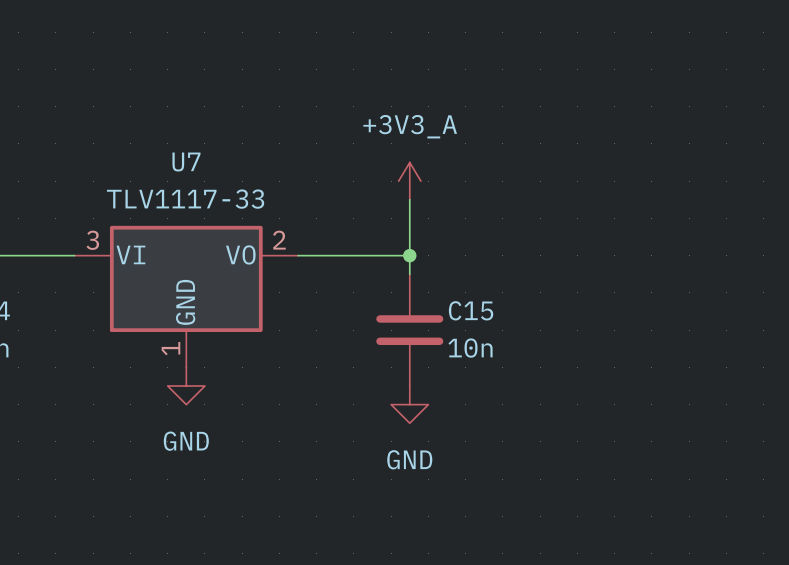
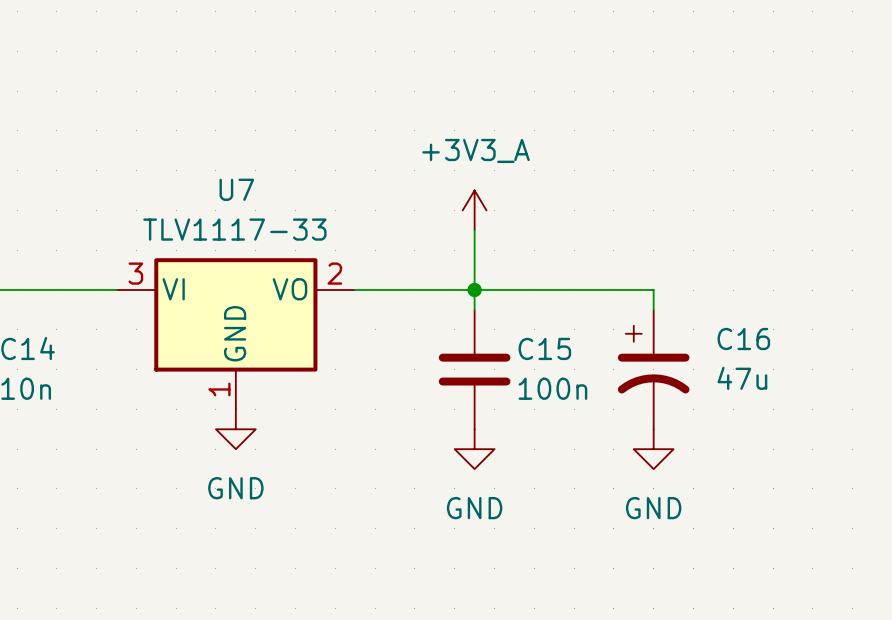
wire: none -> (474, 290) (653, 290) (653, 309)
C16: none -> 47u (653, 369)
C15 value: 10n (470, 348) -> 100n (552, 388)
power symbol: none -> GND (653, 449)

